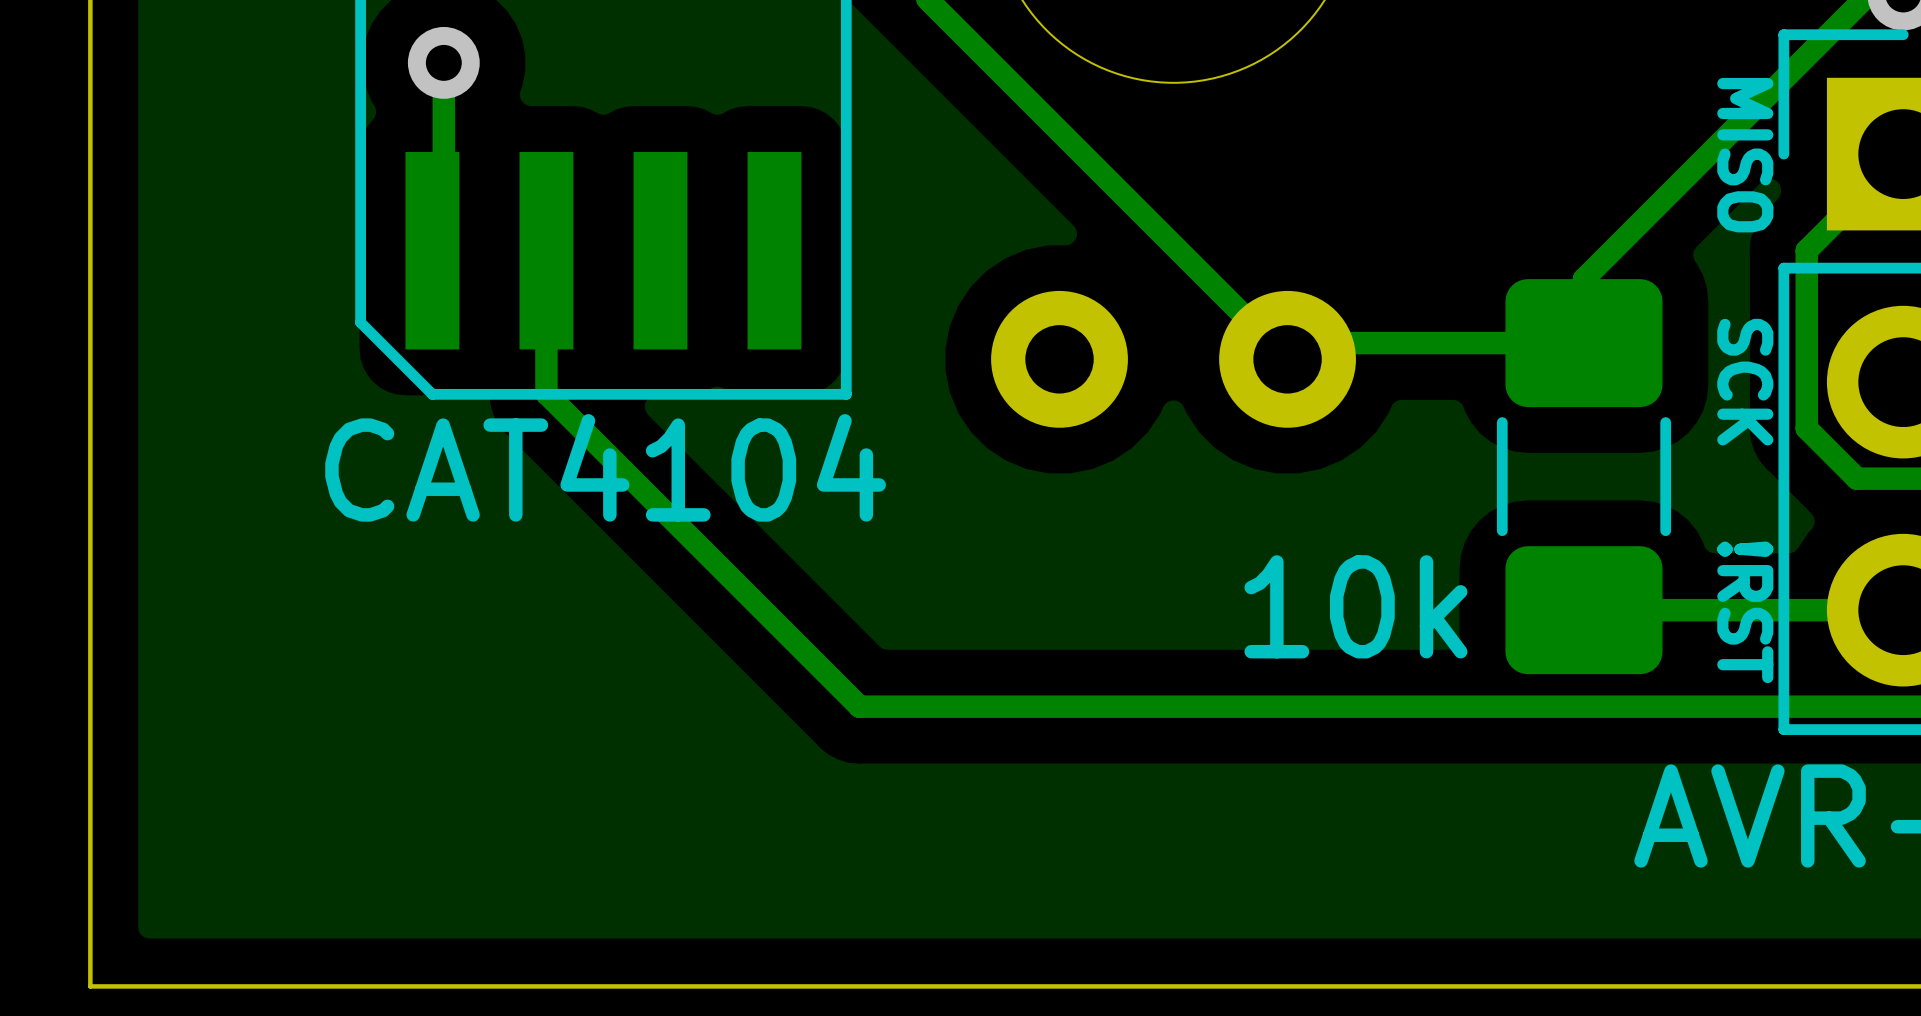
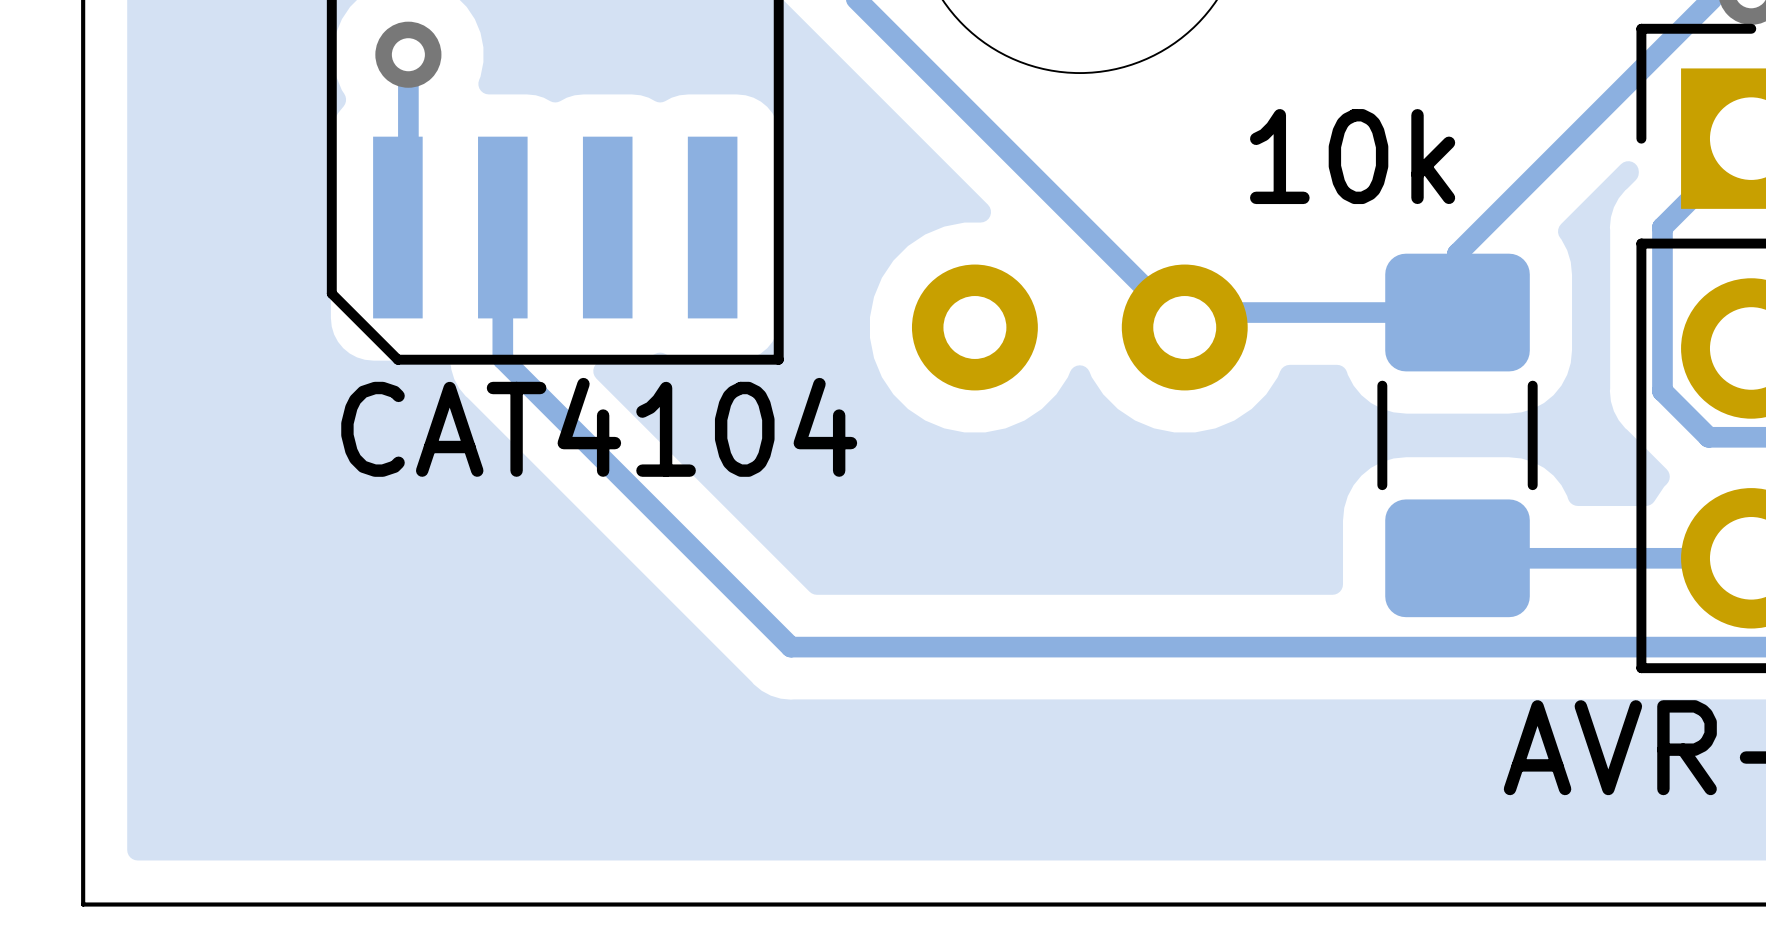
text: MISO (1745, 155) -> none
text: SCK (1745, 382) -> none
part value position: CAT4104 (605, 467) -> CAT4104 (599, 427)
part value position: 10k (1355, 606) -> 10k (1352, 156)
text: !RST (1745, 612) -> none

